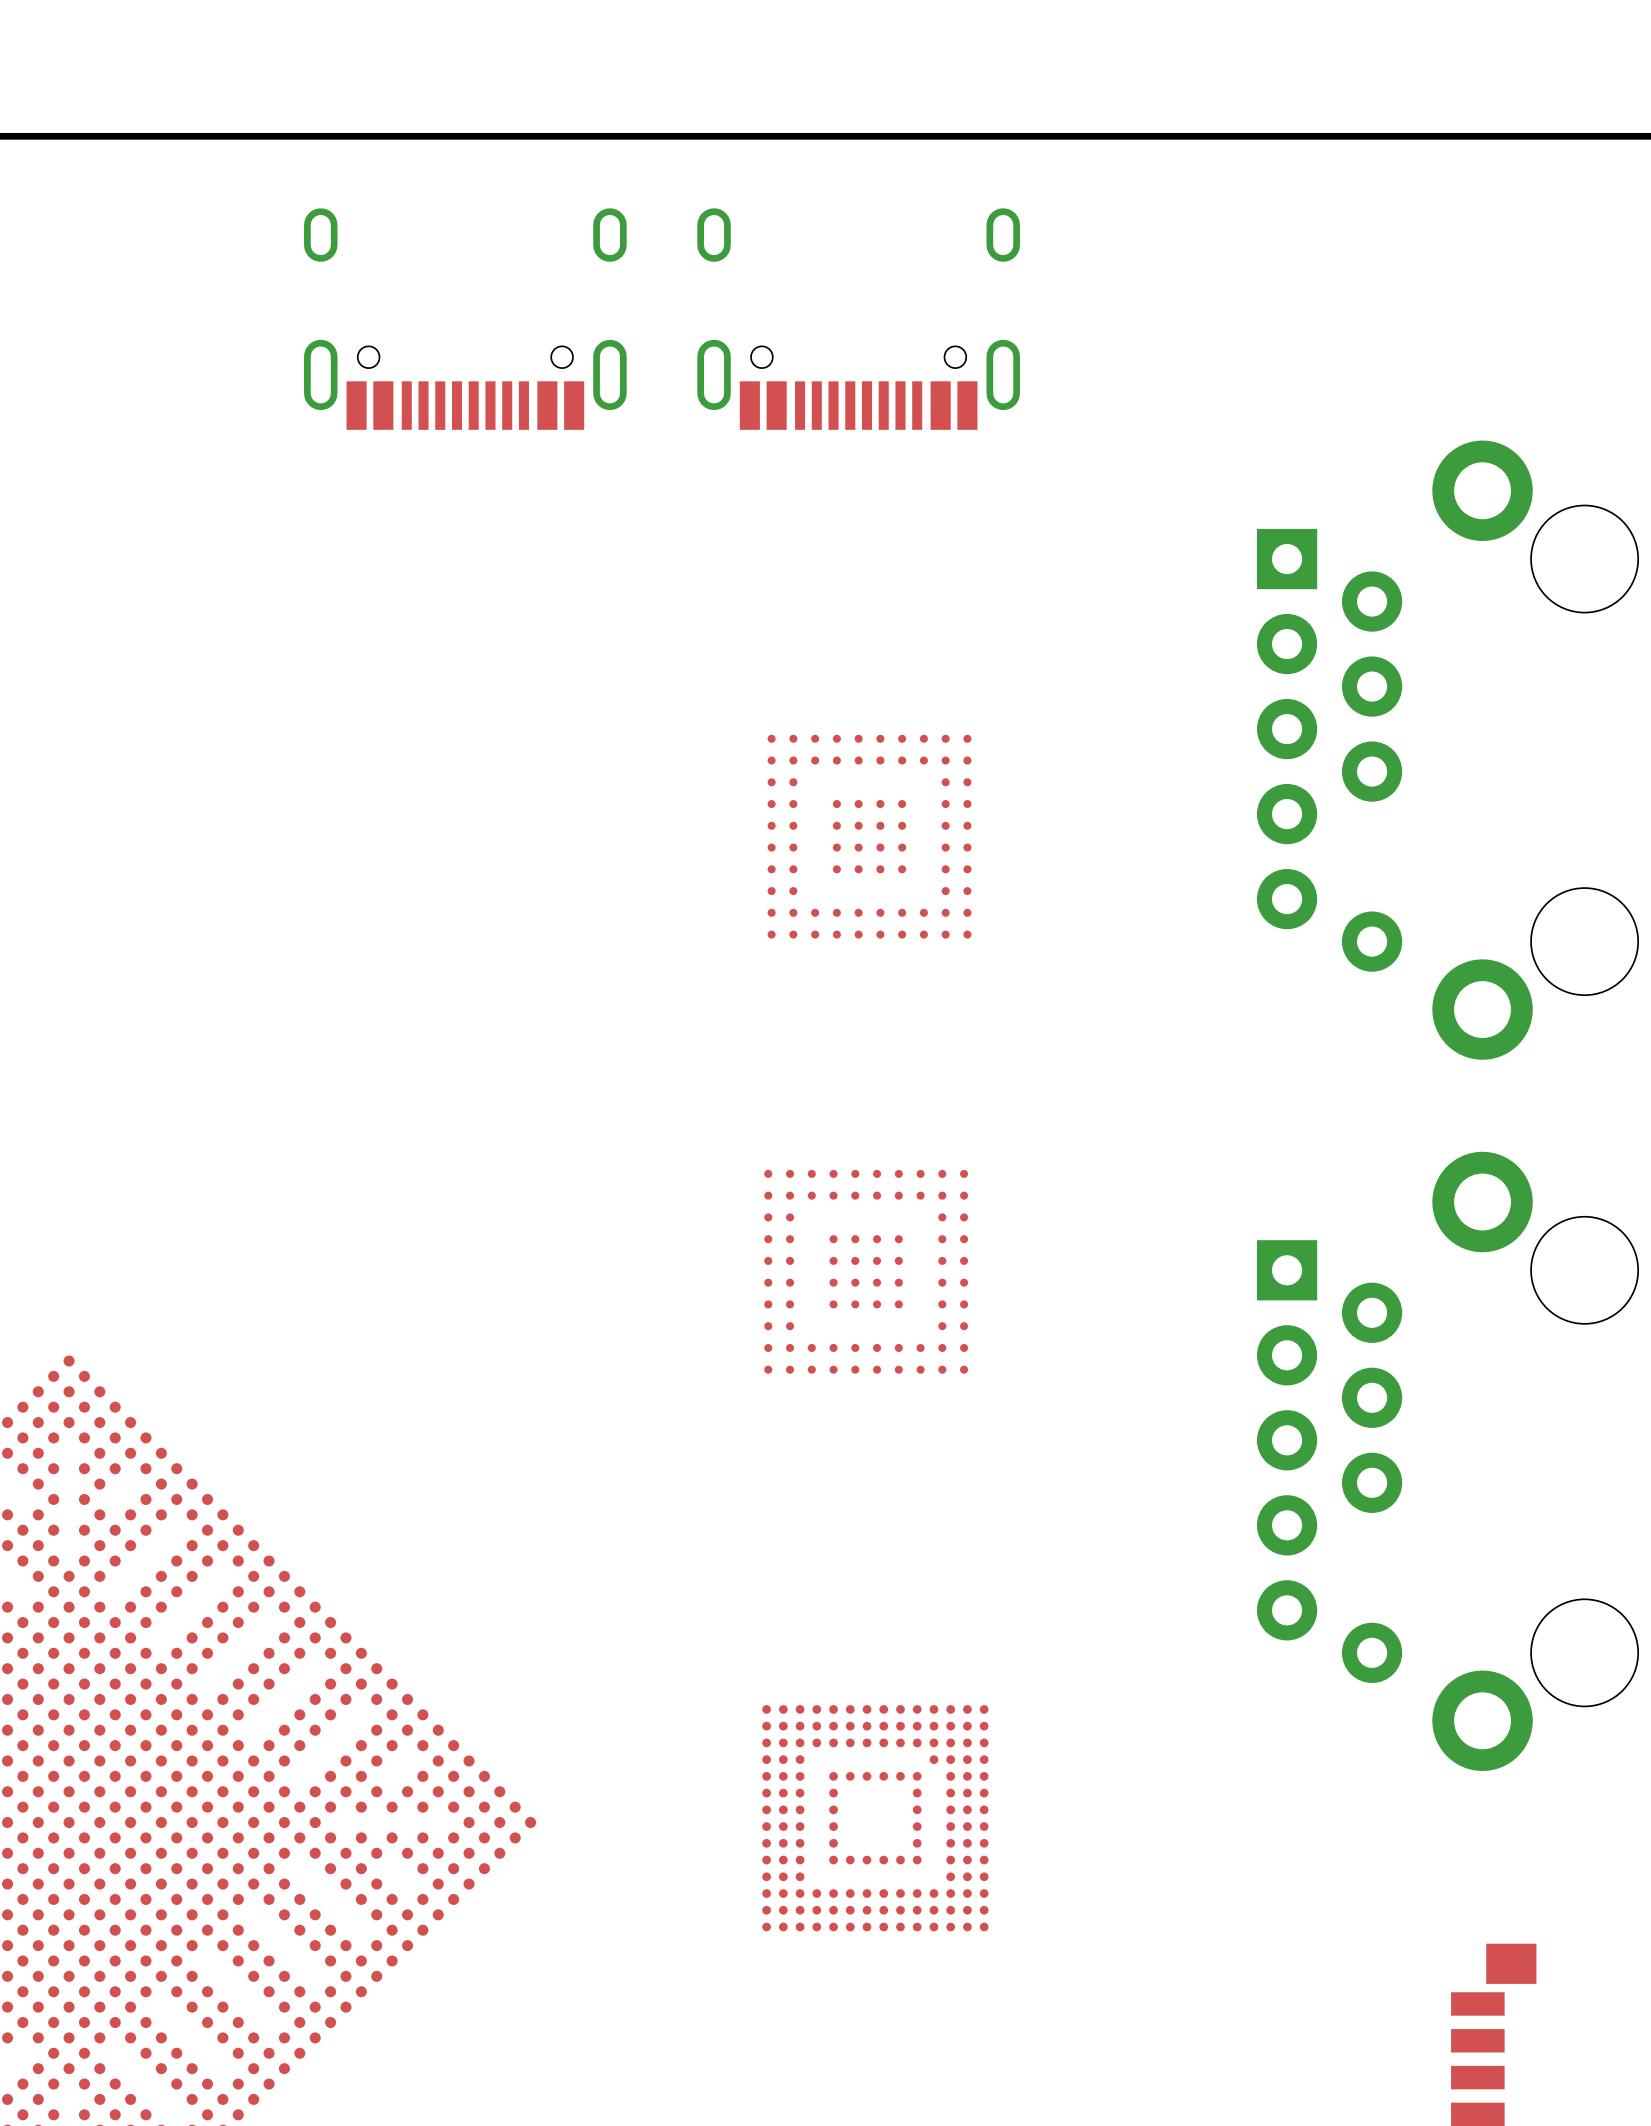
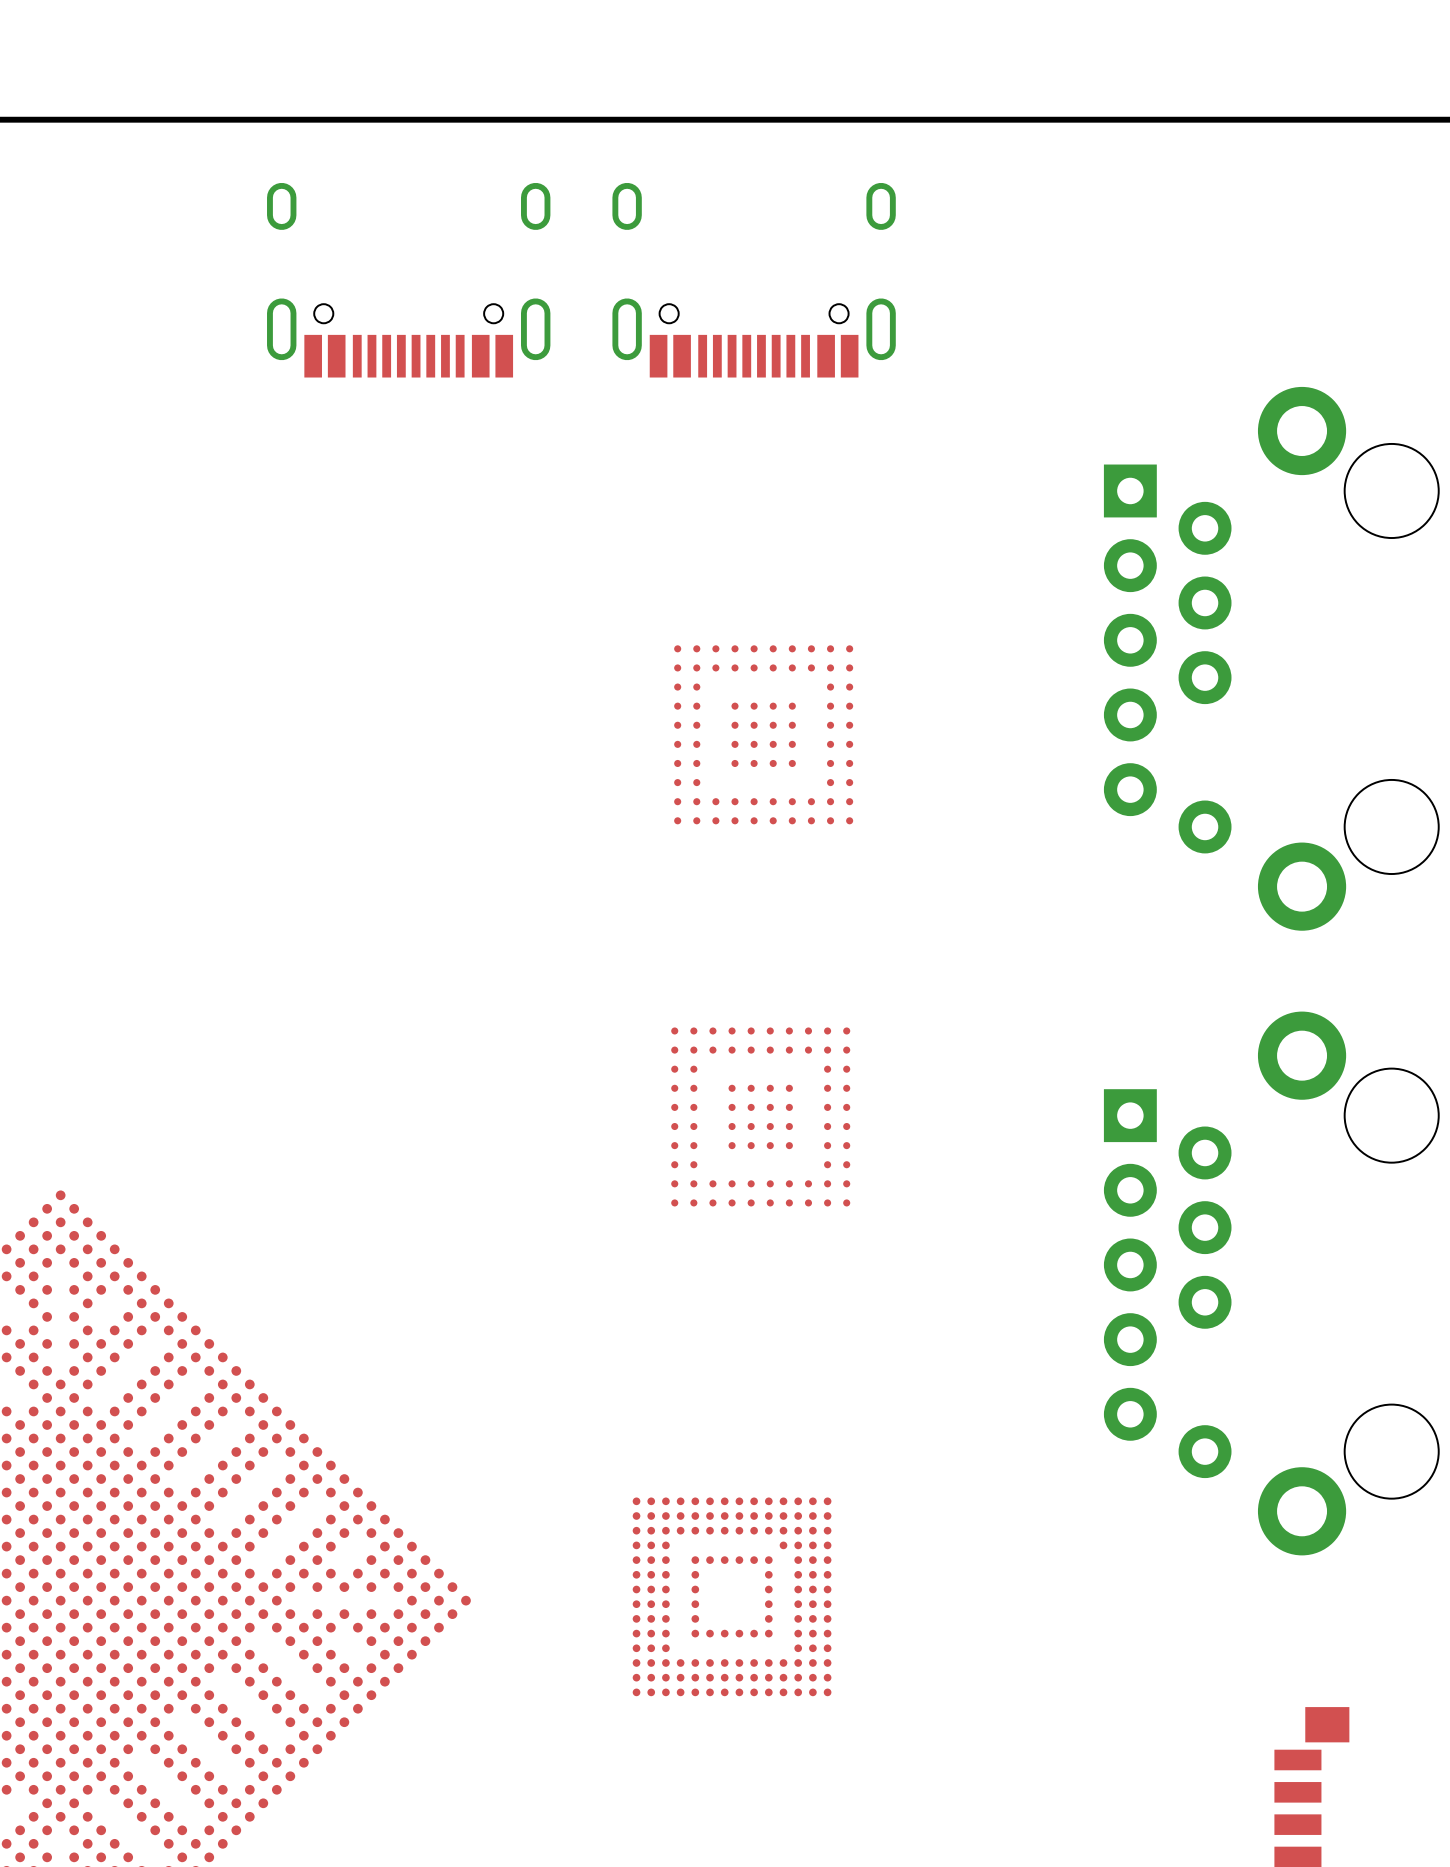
part position: (875, 1818) -> (732, 1596)

